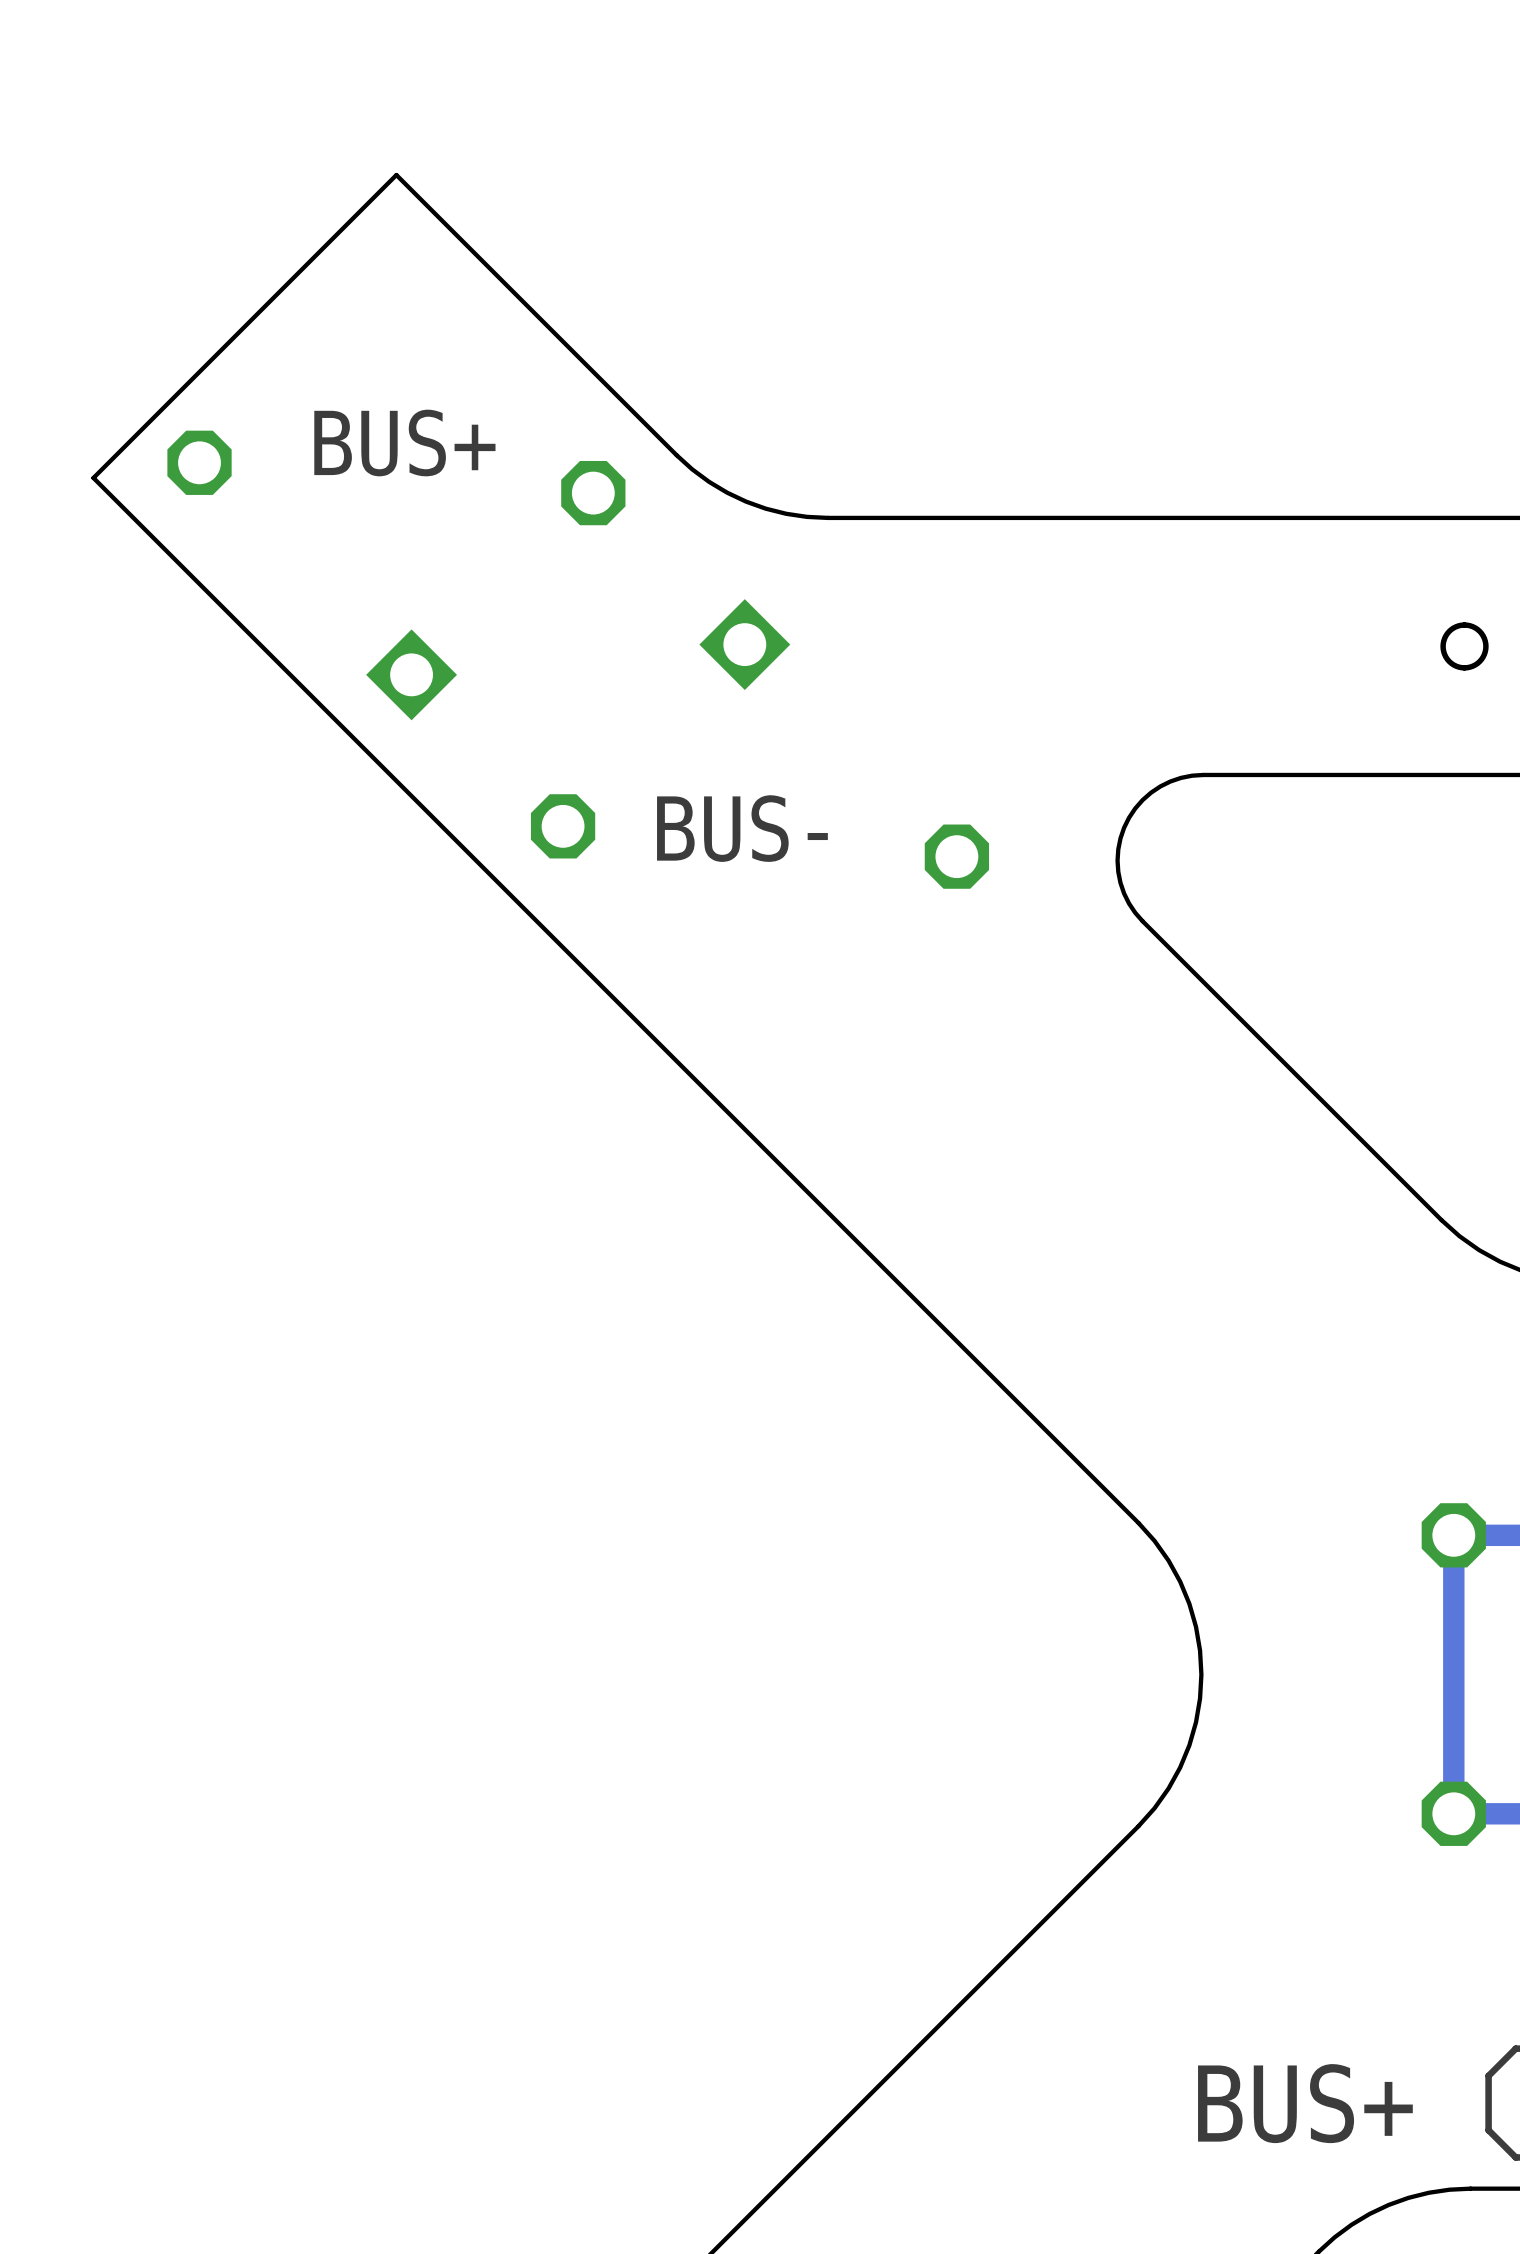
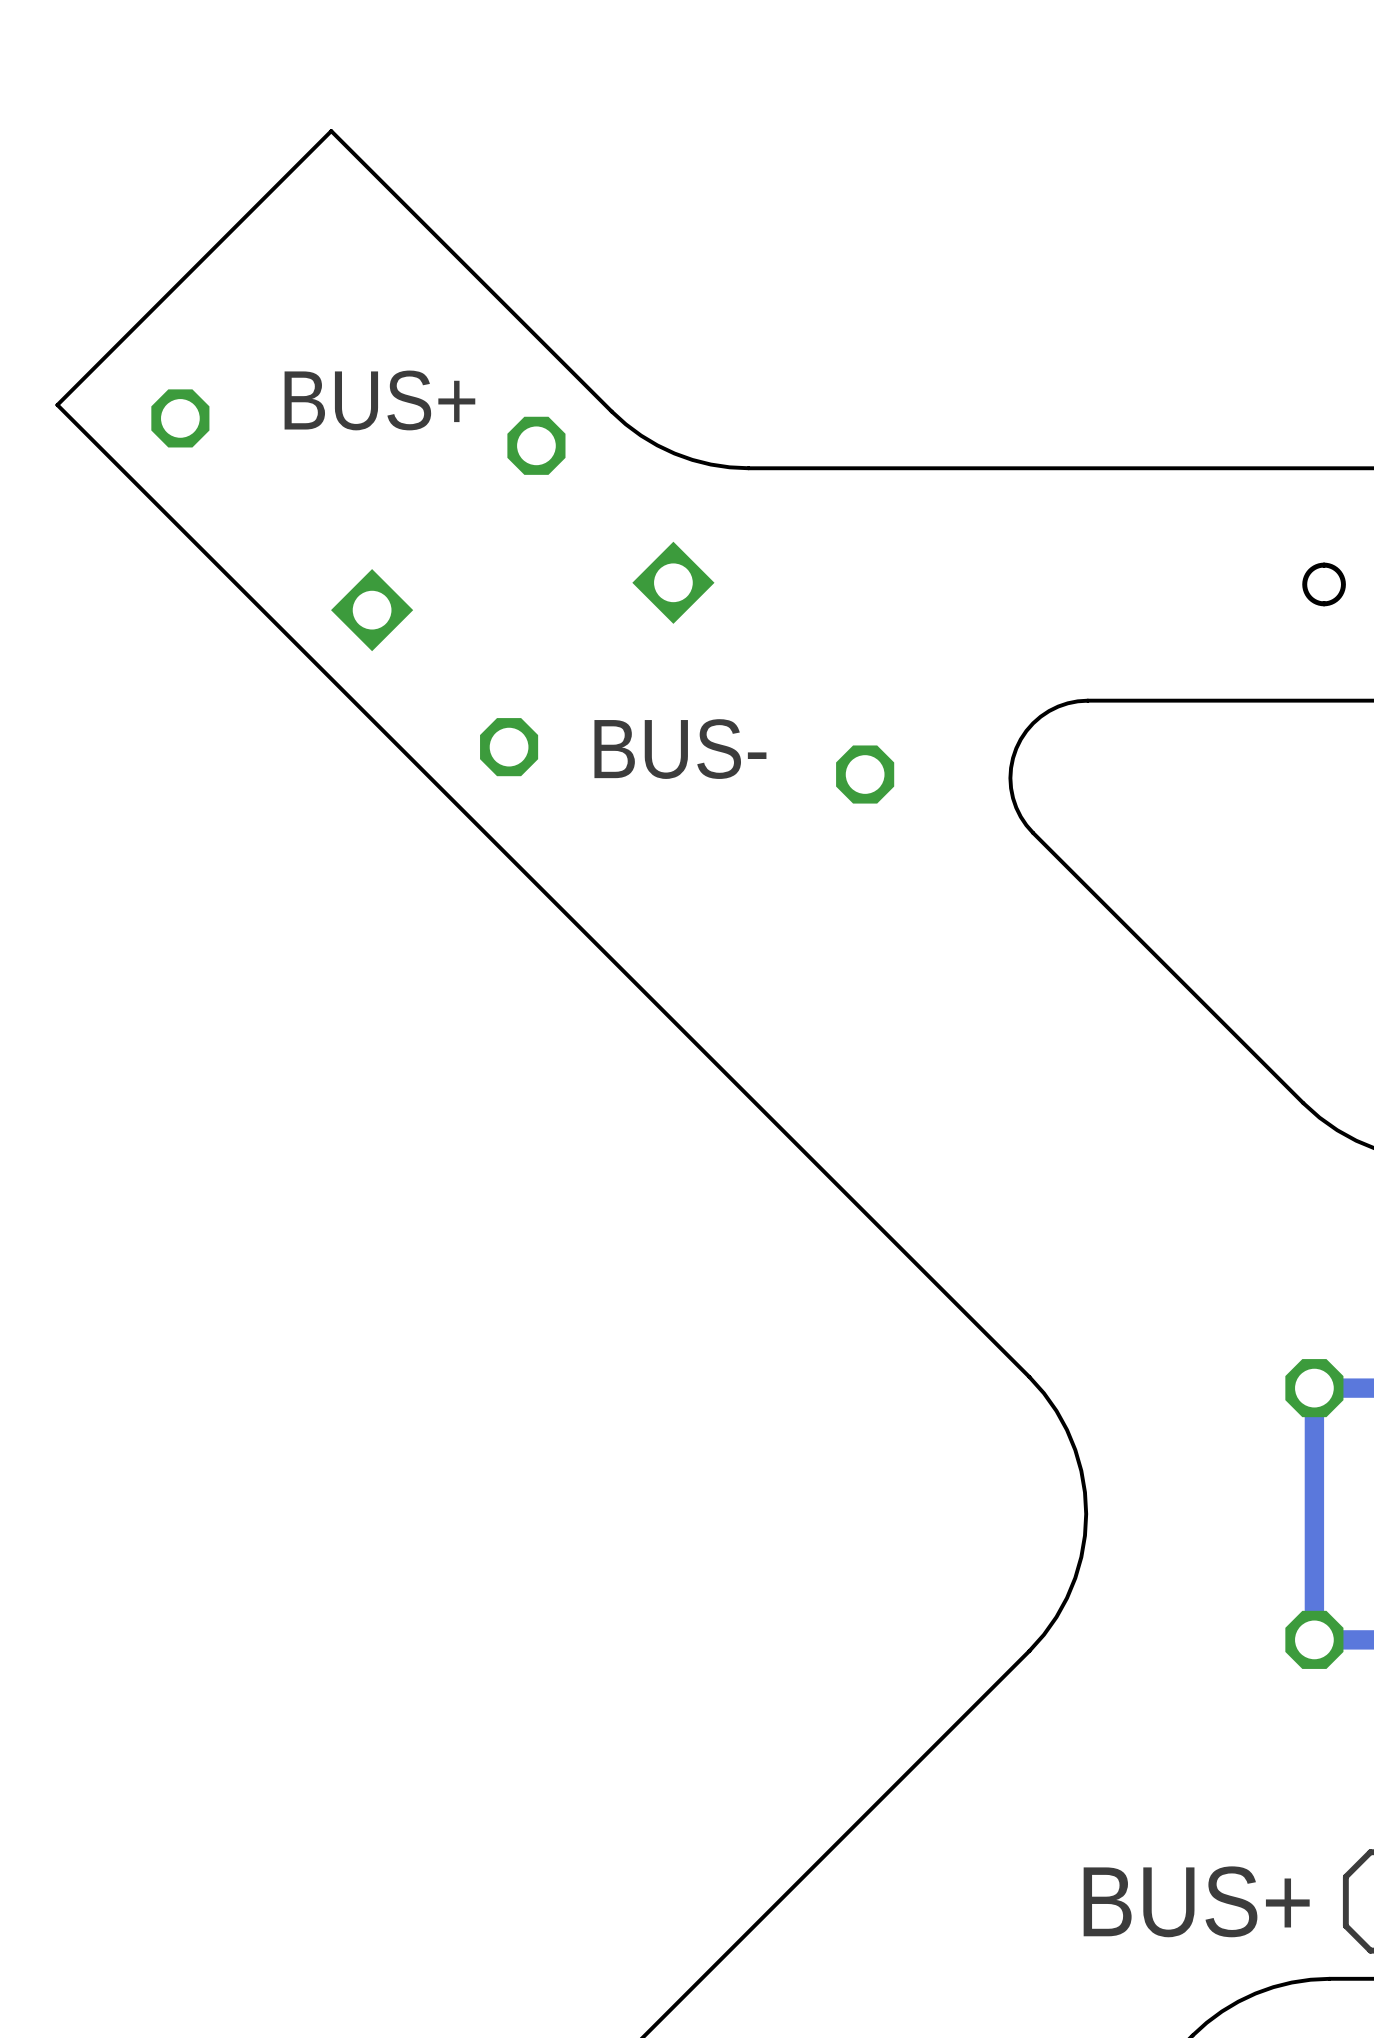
board edge: (396, 175) (93, 477) -> (358, 158) (331, 131) (57, 405) (84, 432)

